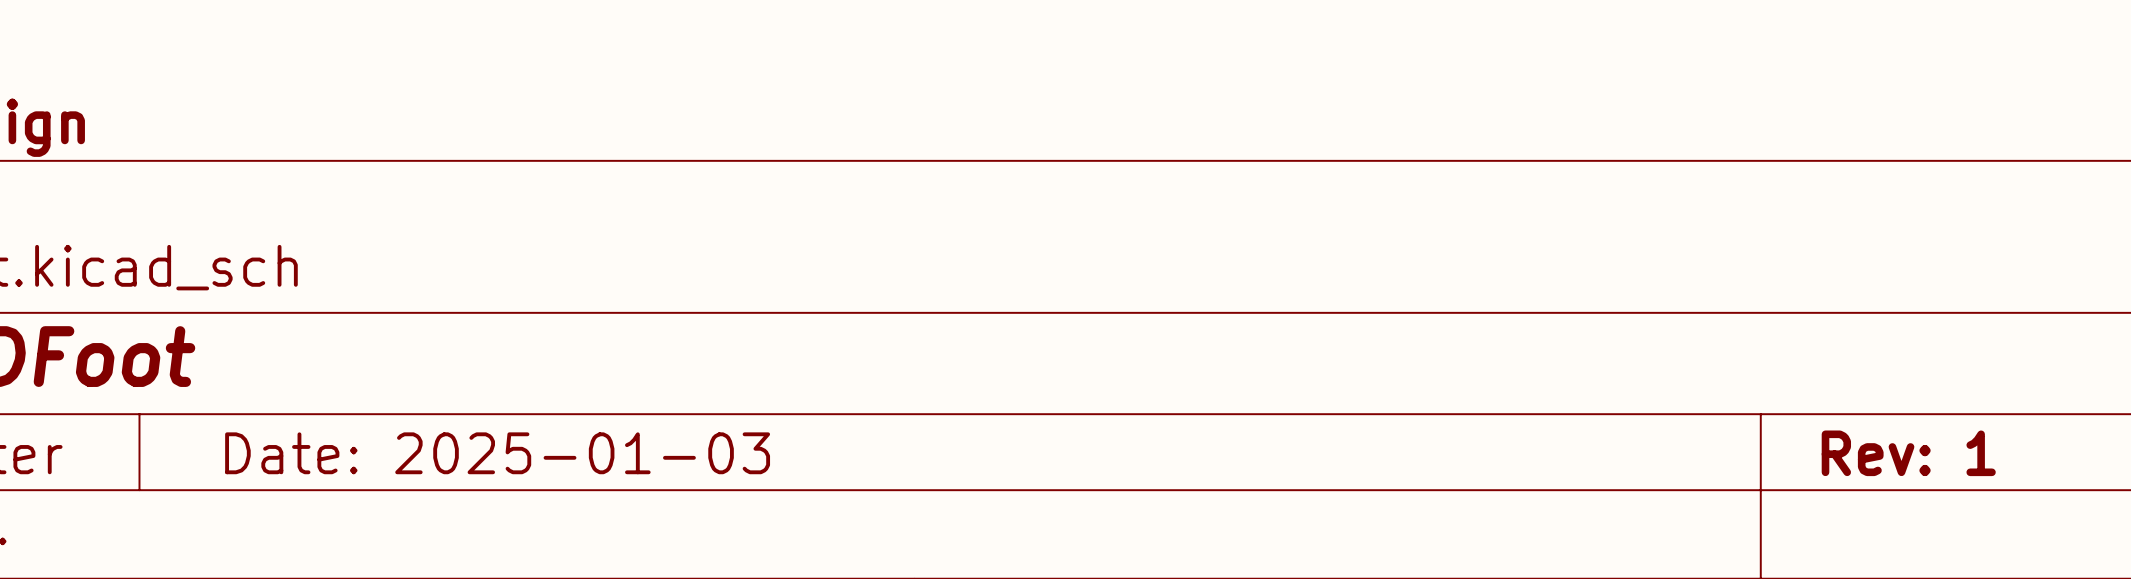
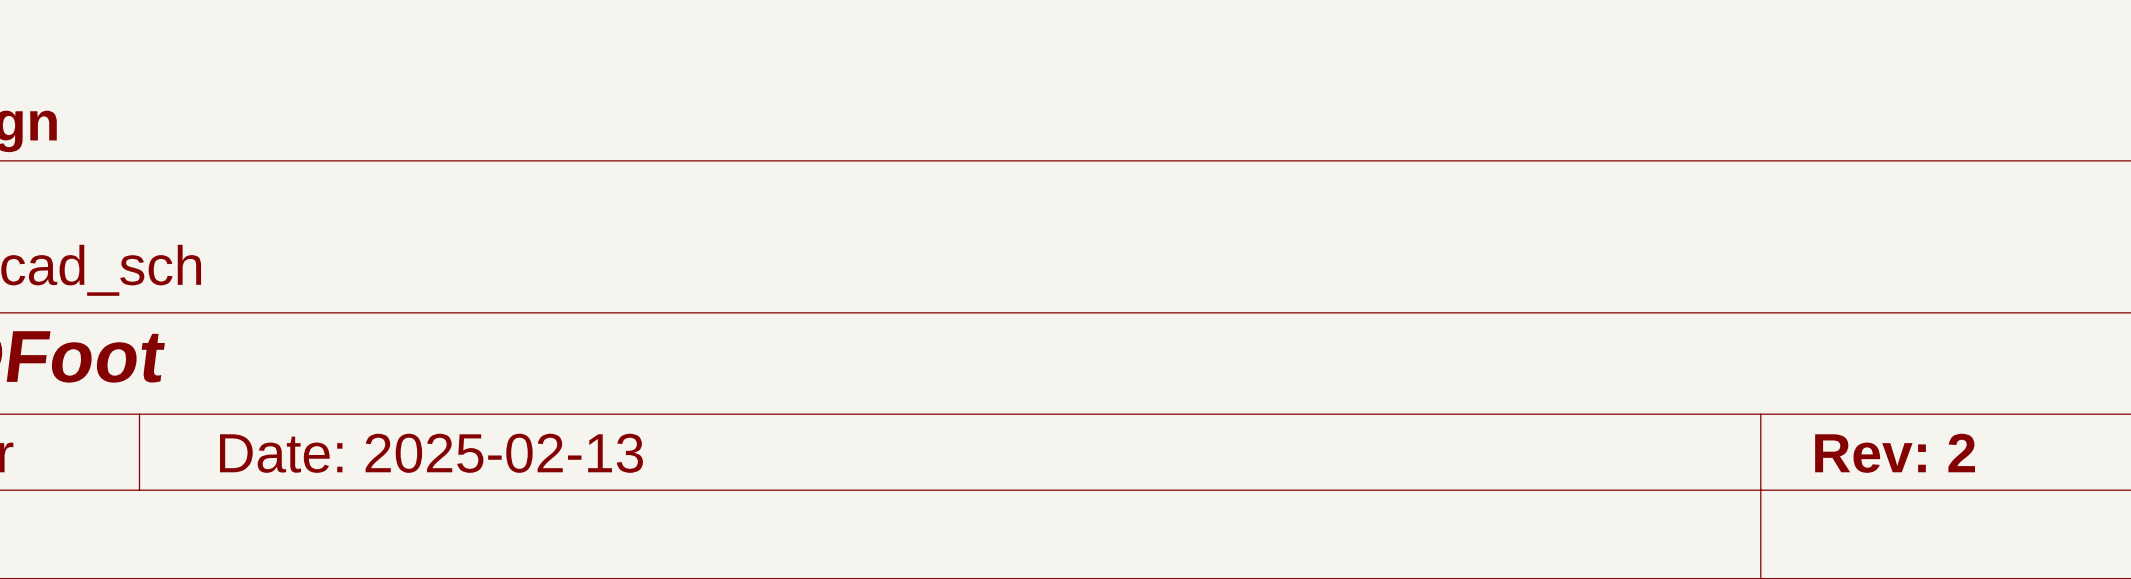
title block: Date: 2025-01-03 (497, 453) -> Date: 2025-02-13 (431, 453)
title block: Rev: 1 (1908, 453) -> Rev: 2 (1895, 453)

